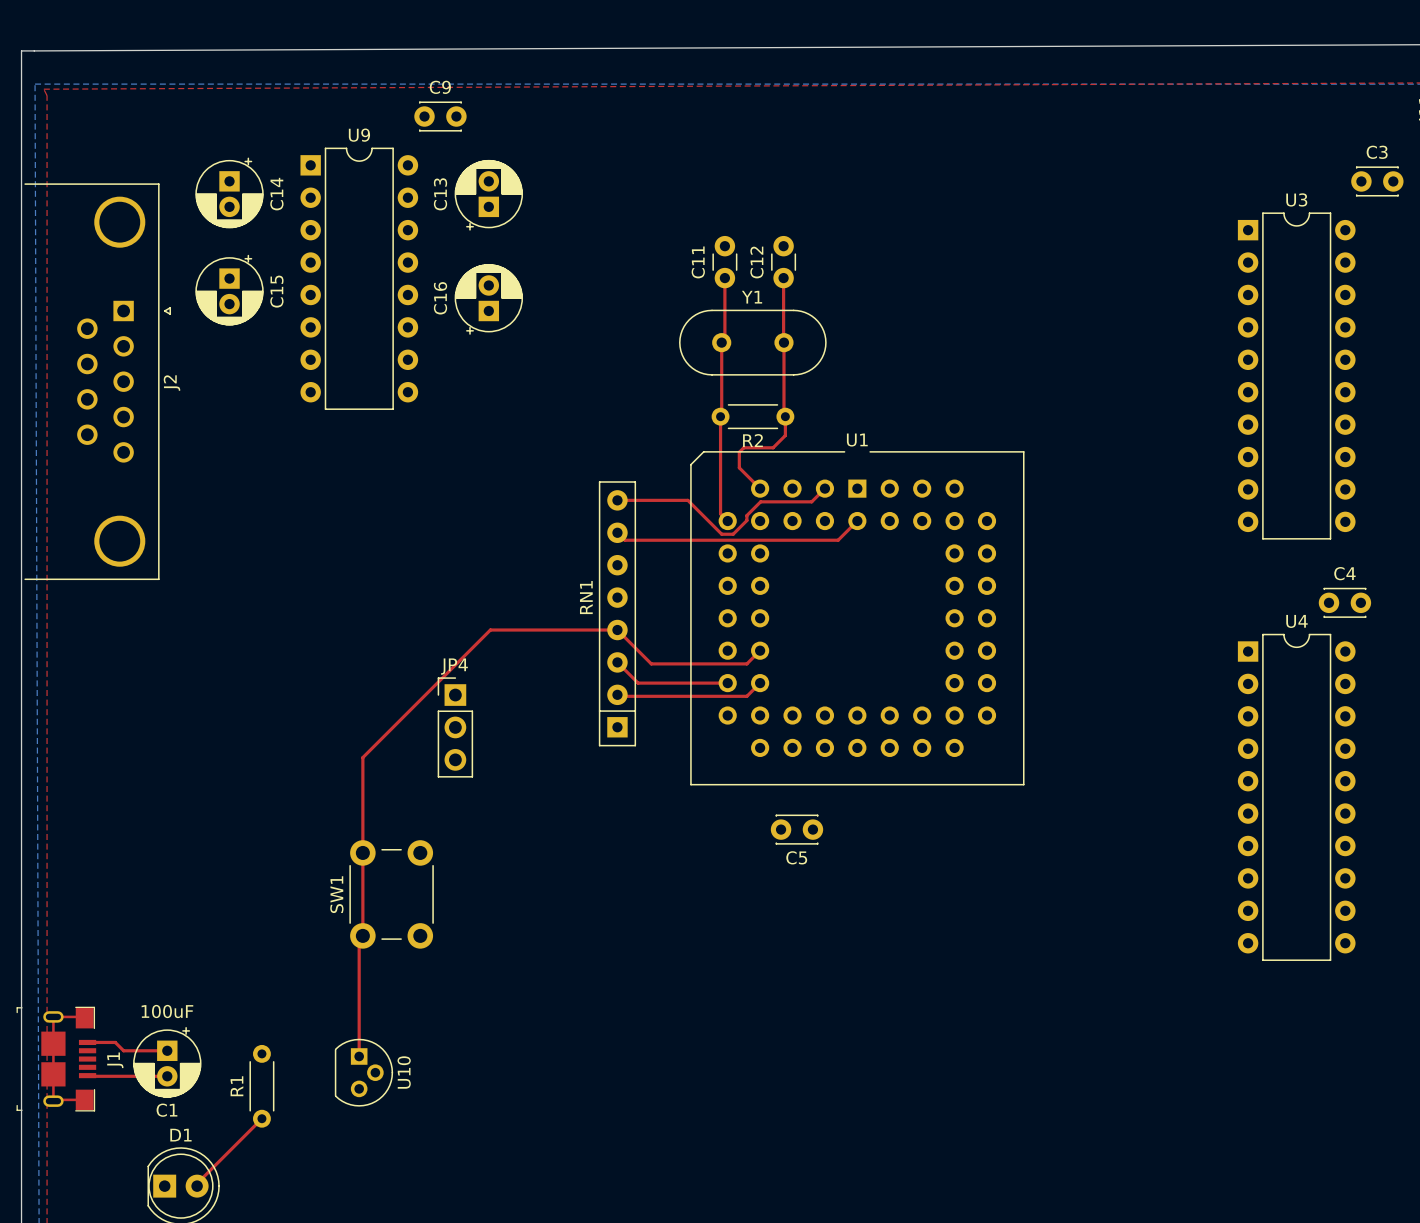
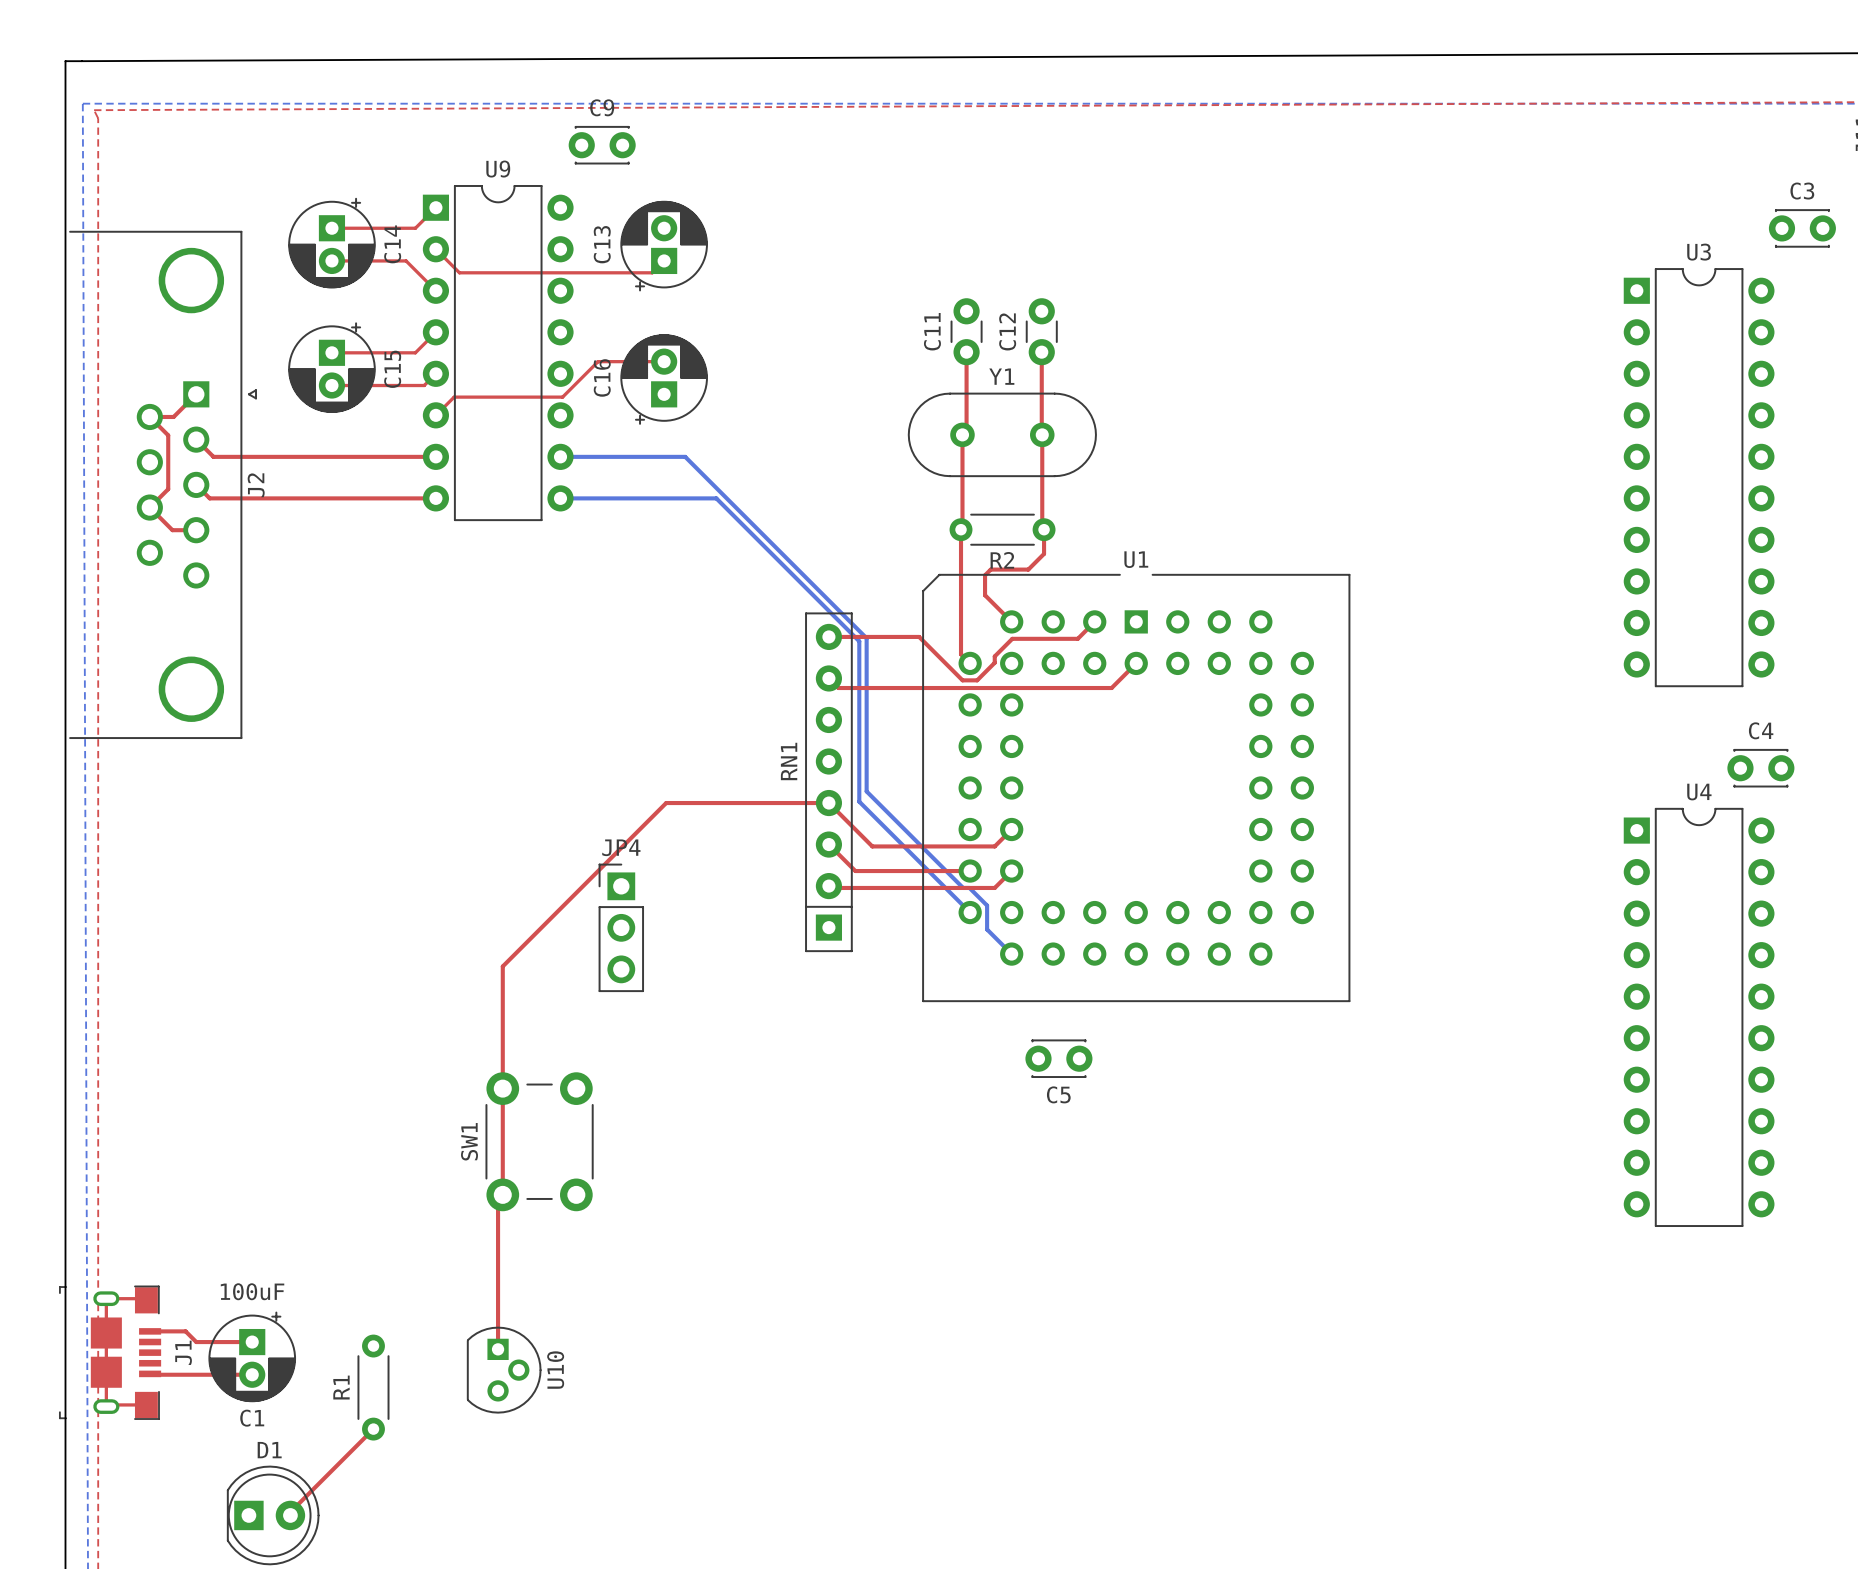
top track: none -> (435, 207) (415, 228) (331, 228)
top track: none -> (435, 249) (459, 272) (652, 272) (664, 260)
top track: none -> (331, 260) (406, 260) (435, 290)
top track: none -> (435, 332) (415, 352) (331, 352)
top track: none -> (664, 361) (598, 361) (562, 397) (454, 397) (435, 415)
top track: none -> (435, 373) (424, 385) (331, 385)
top track: none -> (196, 394) (173, 416) (149, 416) (168, 435) (168, 489) (149, 507) (172, 530) (196, 530)
top track: none -> (196, 439) (213, 456) (435, 456)
bottom track: none -> (560, 456) (685, 456) (866, 638) (866, 791) (963, 887) (969, 887) (987, 905) (987, 929) (1011, 954)
top track: none -> (196, 484) (209, 498) (435, 498)
bottom track: none -> (560, 498) (716, 498) (859, 641) (859, 801) (970, 912)

